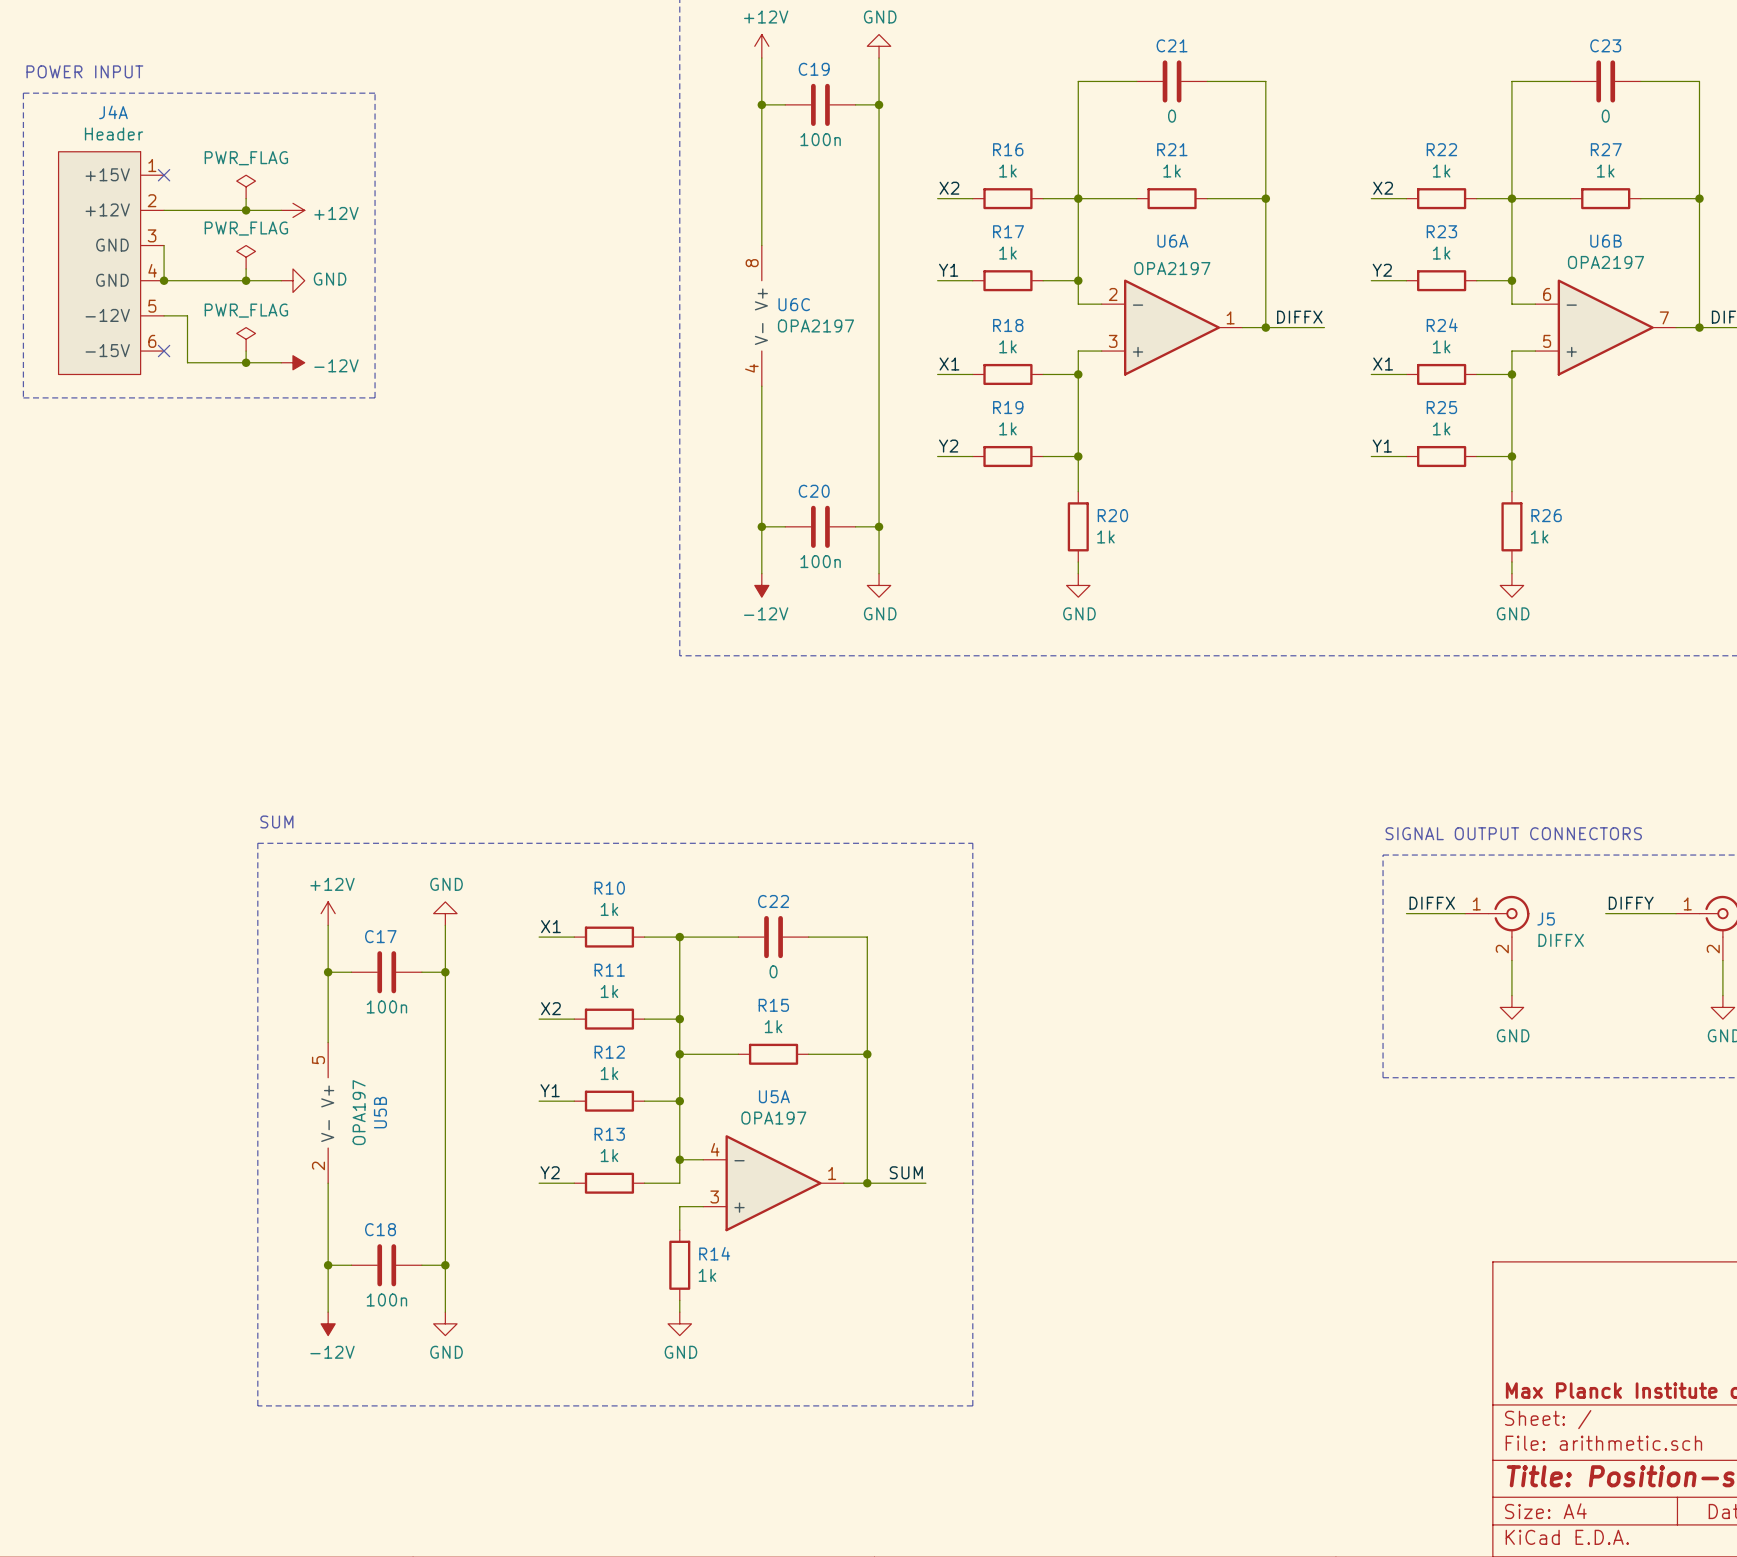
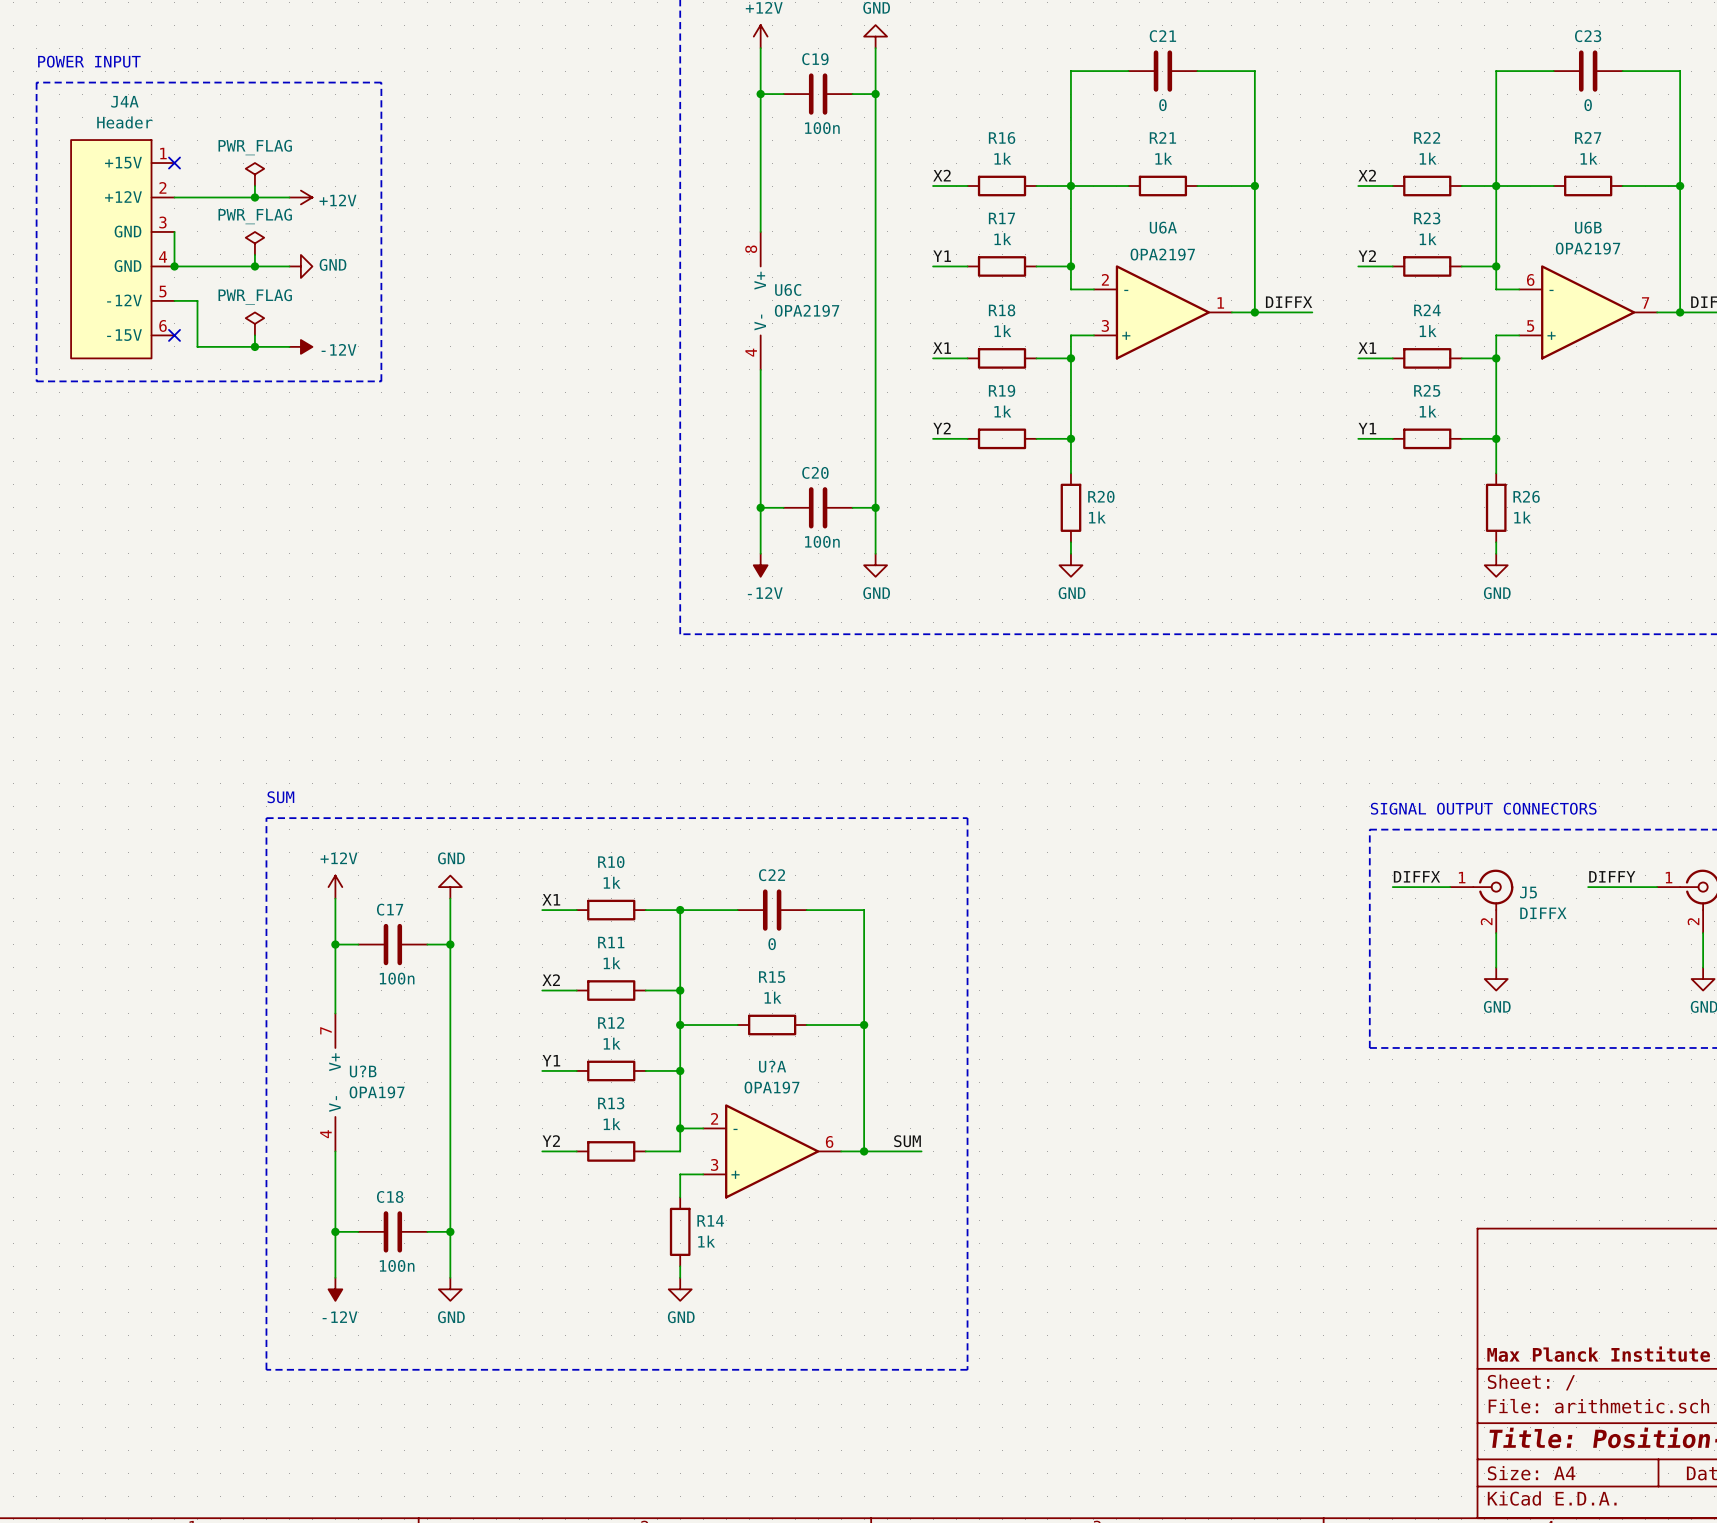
U5B pin number: 5 (318, 1060) -> 7 (325, 1030)
U5A name: U5A (774, 1096) -> U?A (772, 1066)
U5B value rotation: 0° (359, 1112) -> 90° clockwise (377, 1092)
U5B name: U5B (380, 1112) -> U?B (363, 1071)
U5A pin number: 4 (715, 1149) -> 2 (714, 1118)
U5B pin number: 2 (318, 1165) -> 4 (325, 1134)
U5A pin number: 1 (832, 1173) -> 6 (829, 1141)

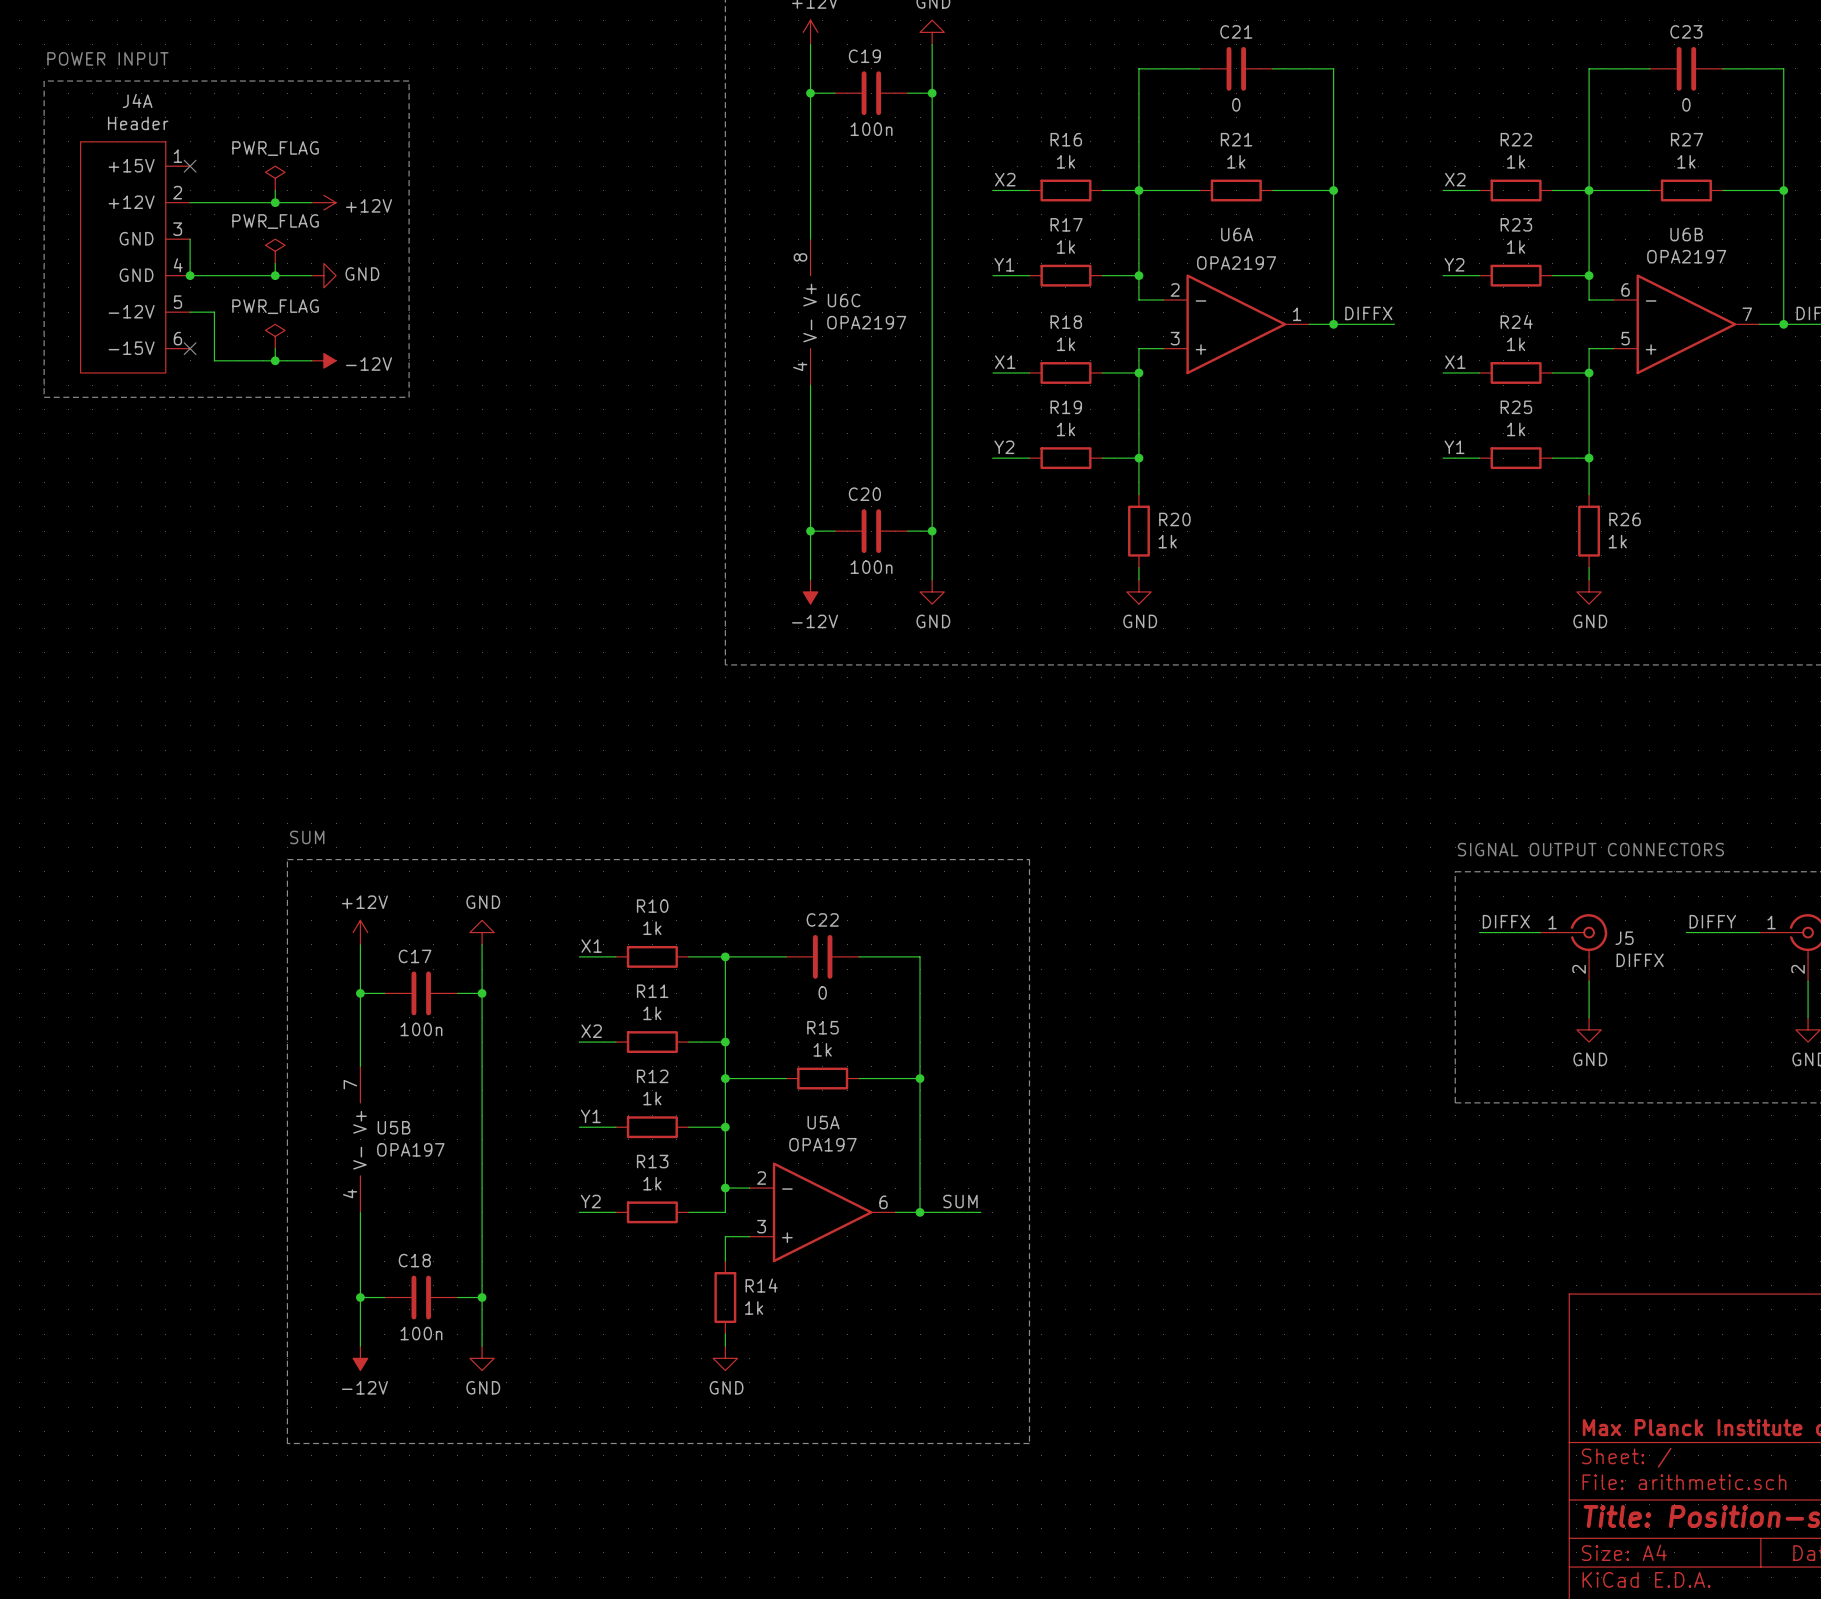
U?A name: U?A (772, 1066) -> U5A (823, 1122)
U?B name: U?B (363, 1071) -> U5B (394, 1127)

